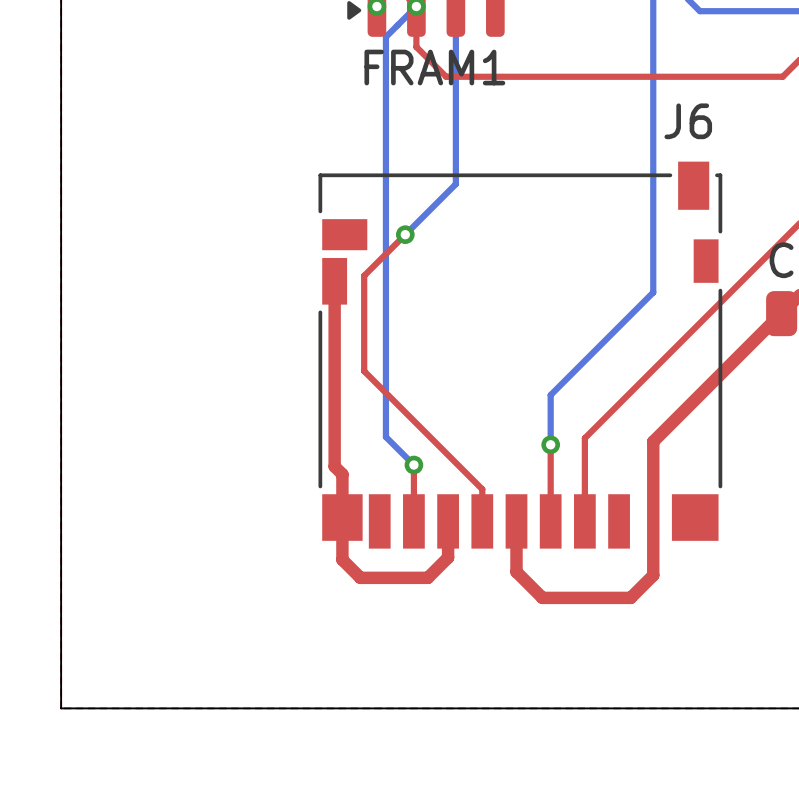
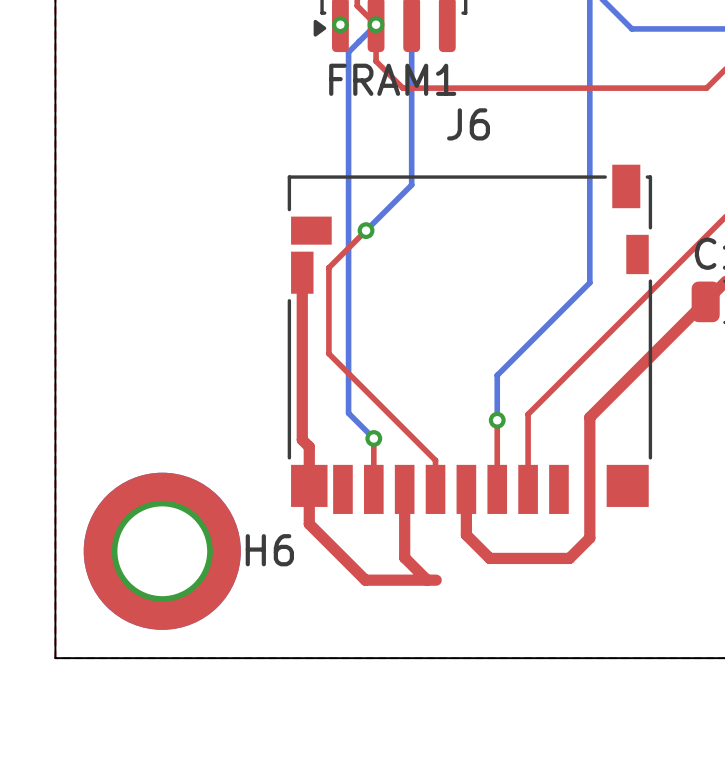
J6 name position: J6 (688, 121) -> J6 (468, 124)
top track: (448, 557) (427, 577) (360, 577) -> (436, 580) (365, 580) (325, 540)
top track: none -> (404, 522) (404, 557) (427, 580)
H6: none -> (162, 551)

